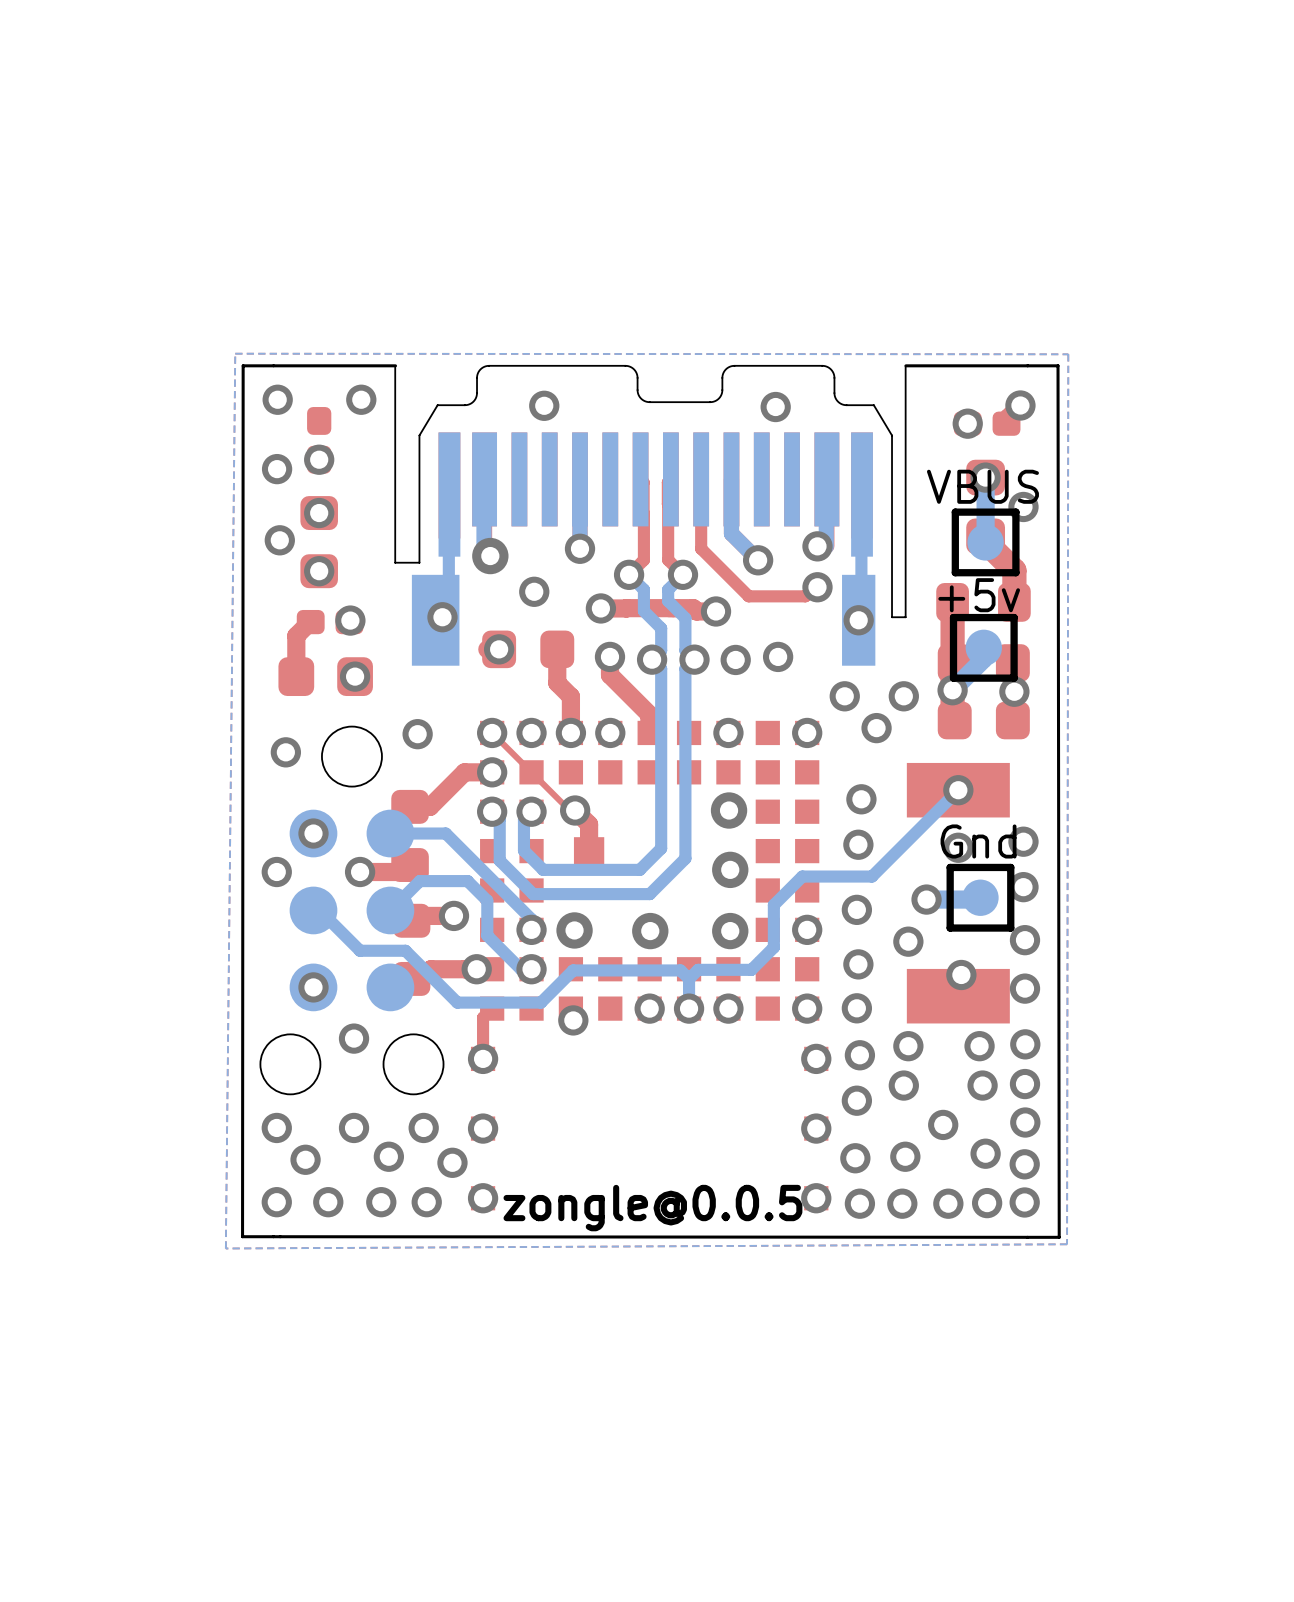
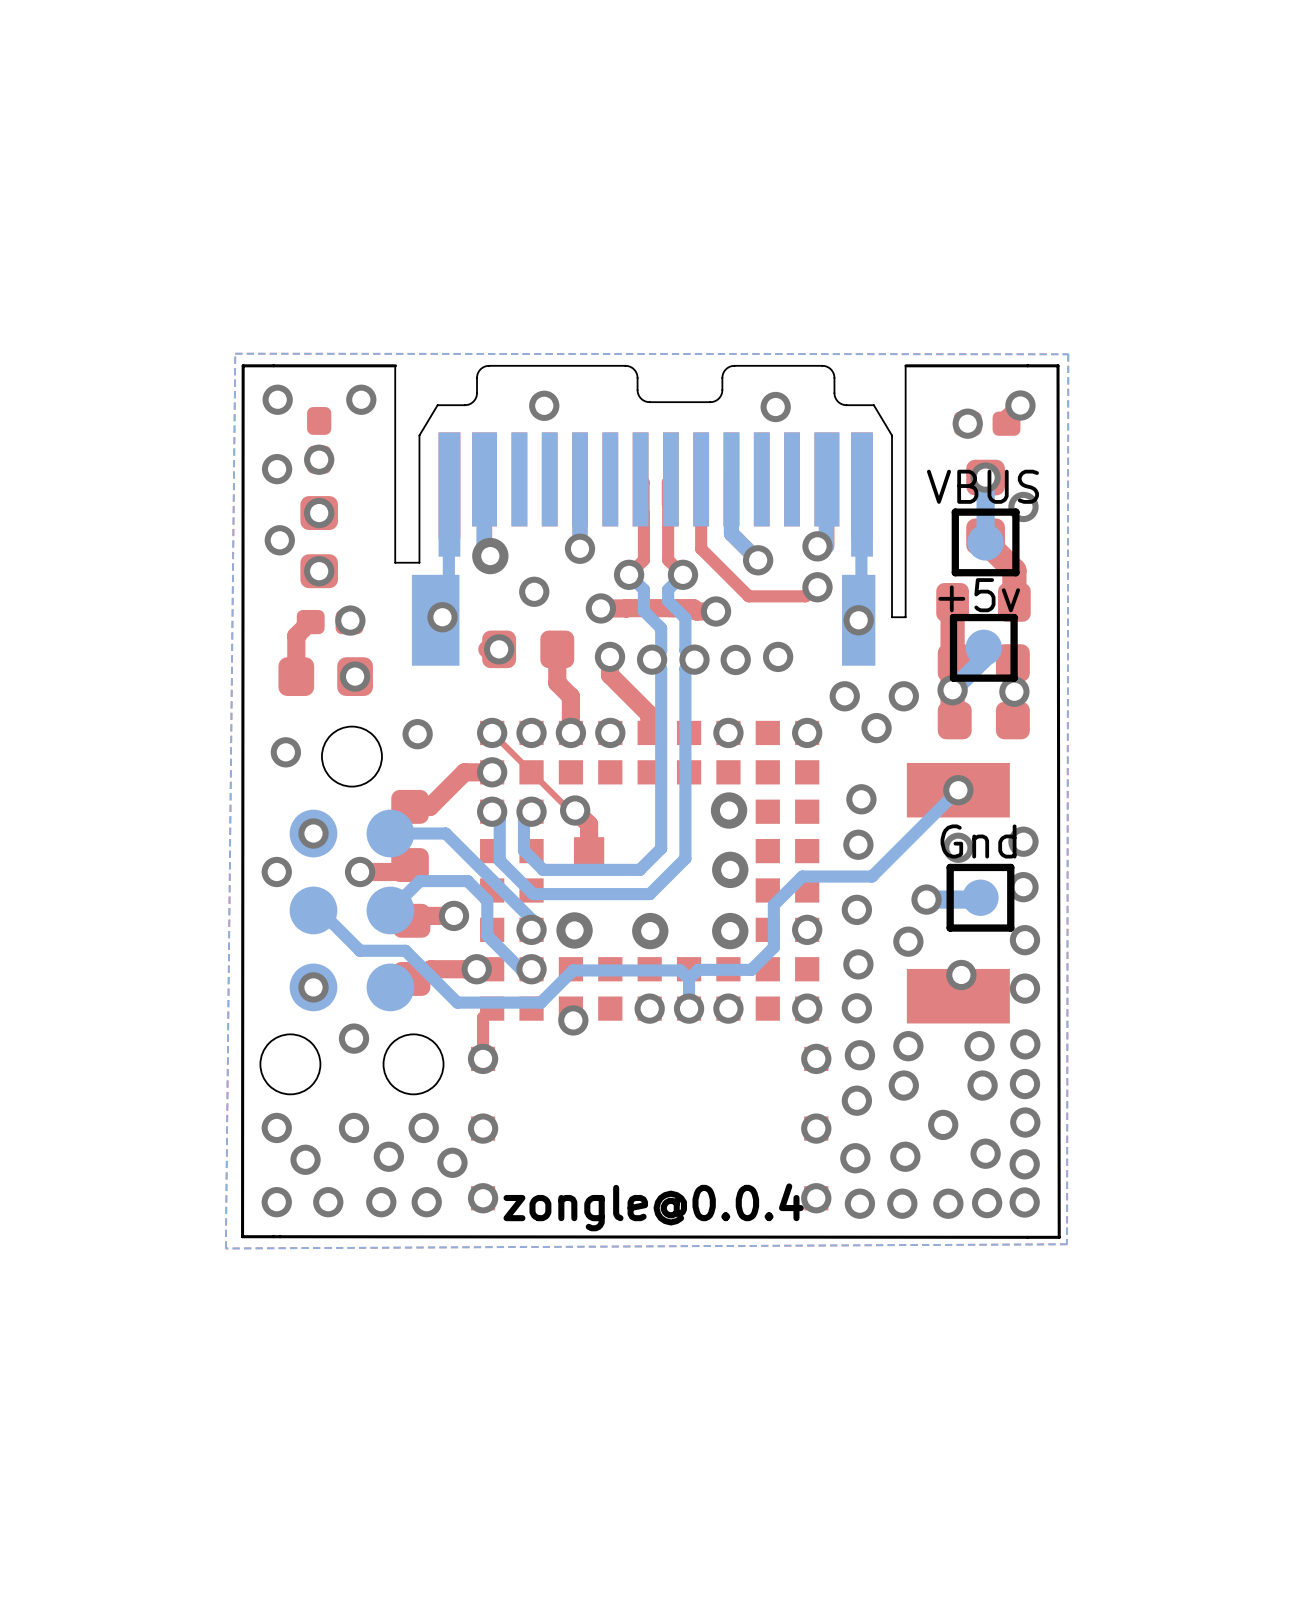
text: zongle@0.0.5 (652, 1208) -> zongle@0.0.4 (653, 1207)

